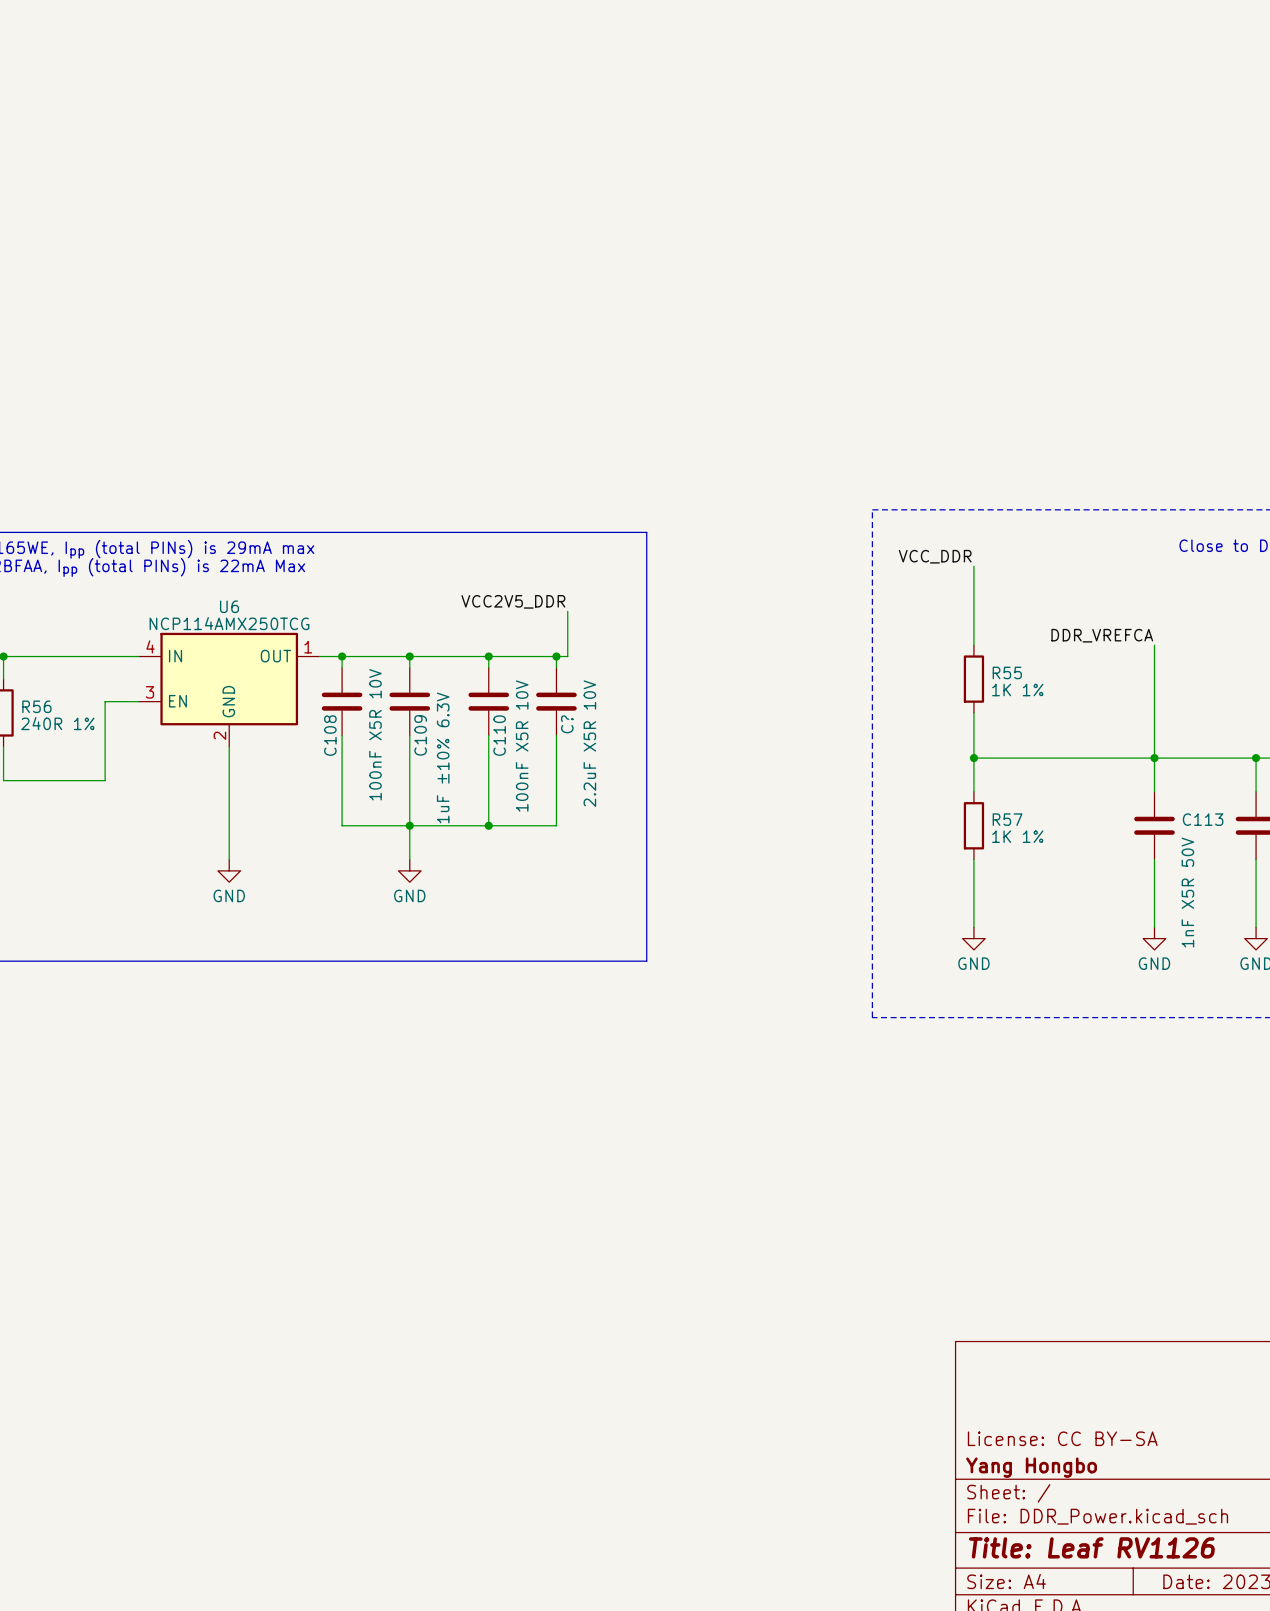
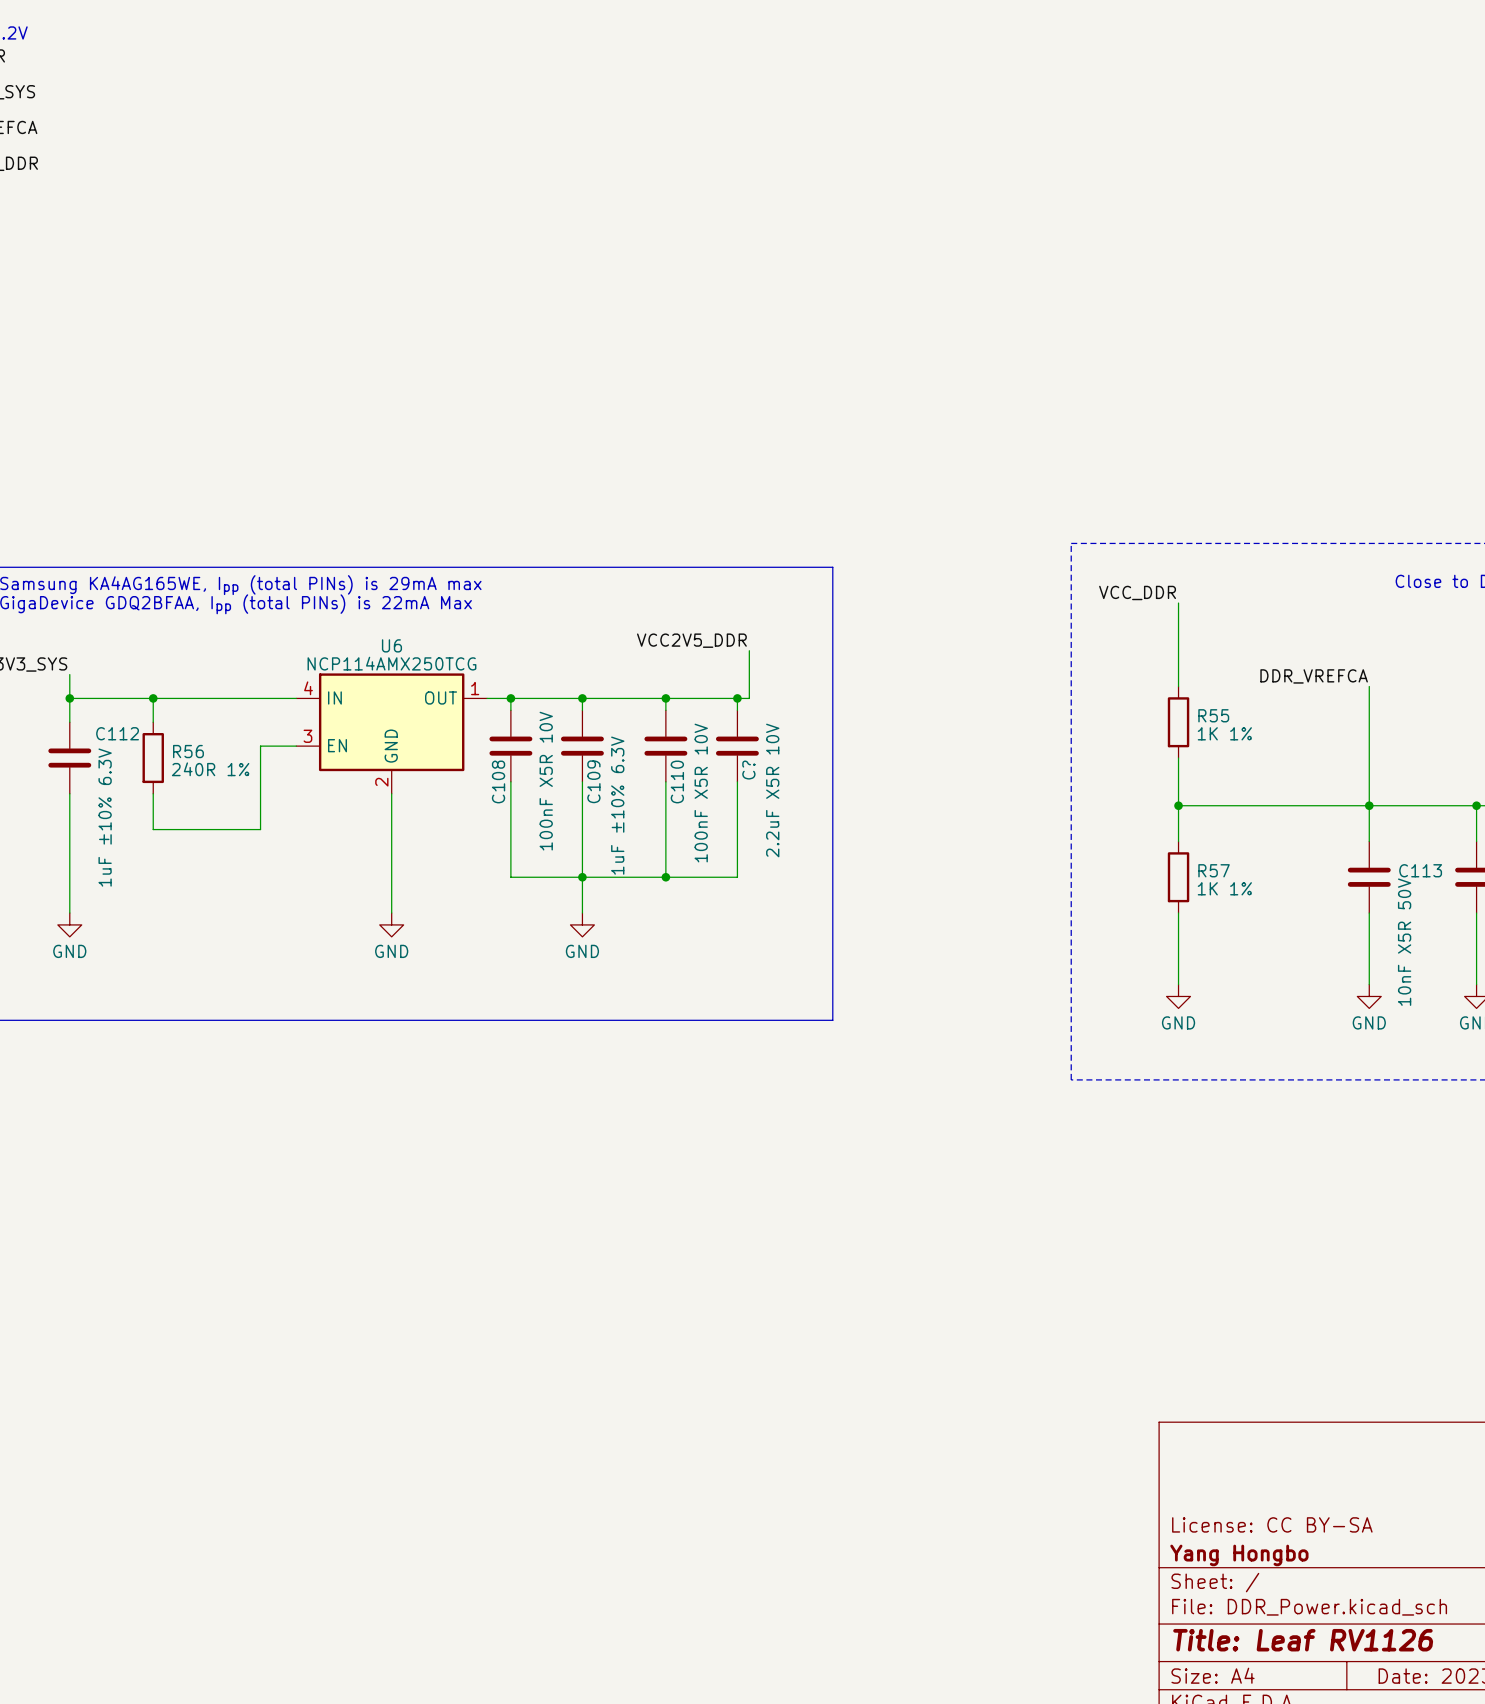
C113 value: 1nF X5R 50V (1187, 892) -> 10nF X5R 50V (1404, 942)

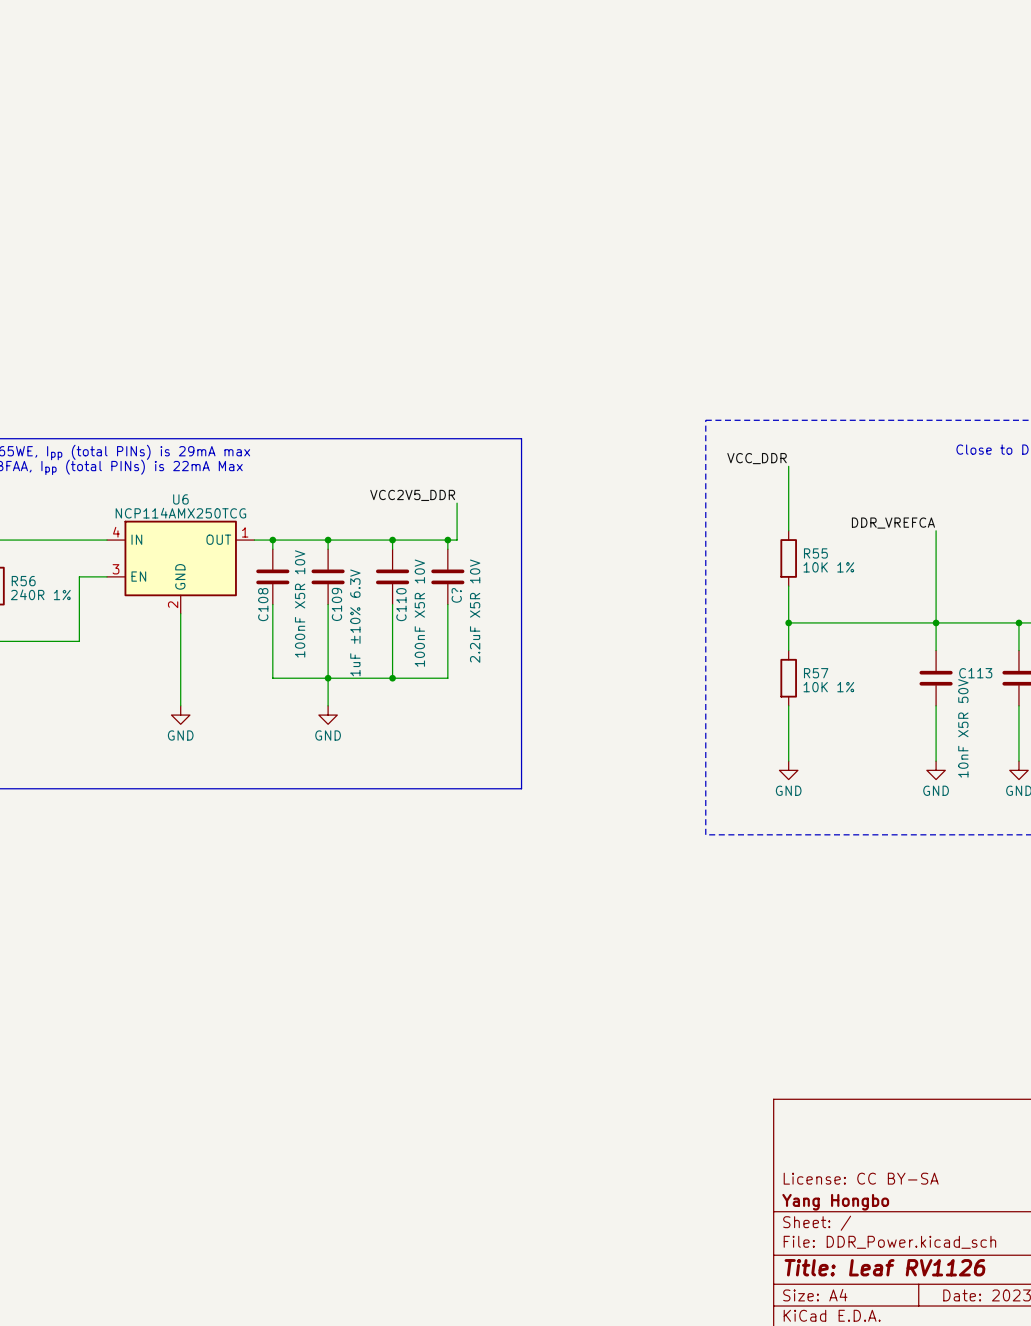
R55 value: 1K 1% (1224, 733) -> 10K 1% (828, 567)
R57 value: 1K 1% (1224, 888) -> 10K 1% (828, 687)

